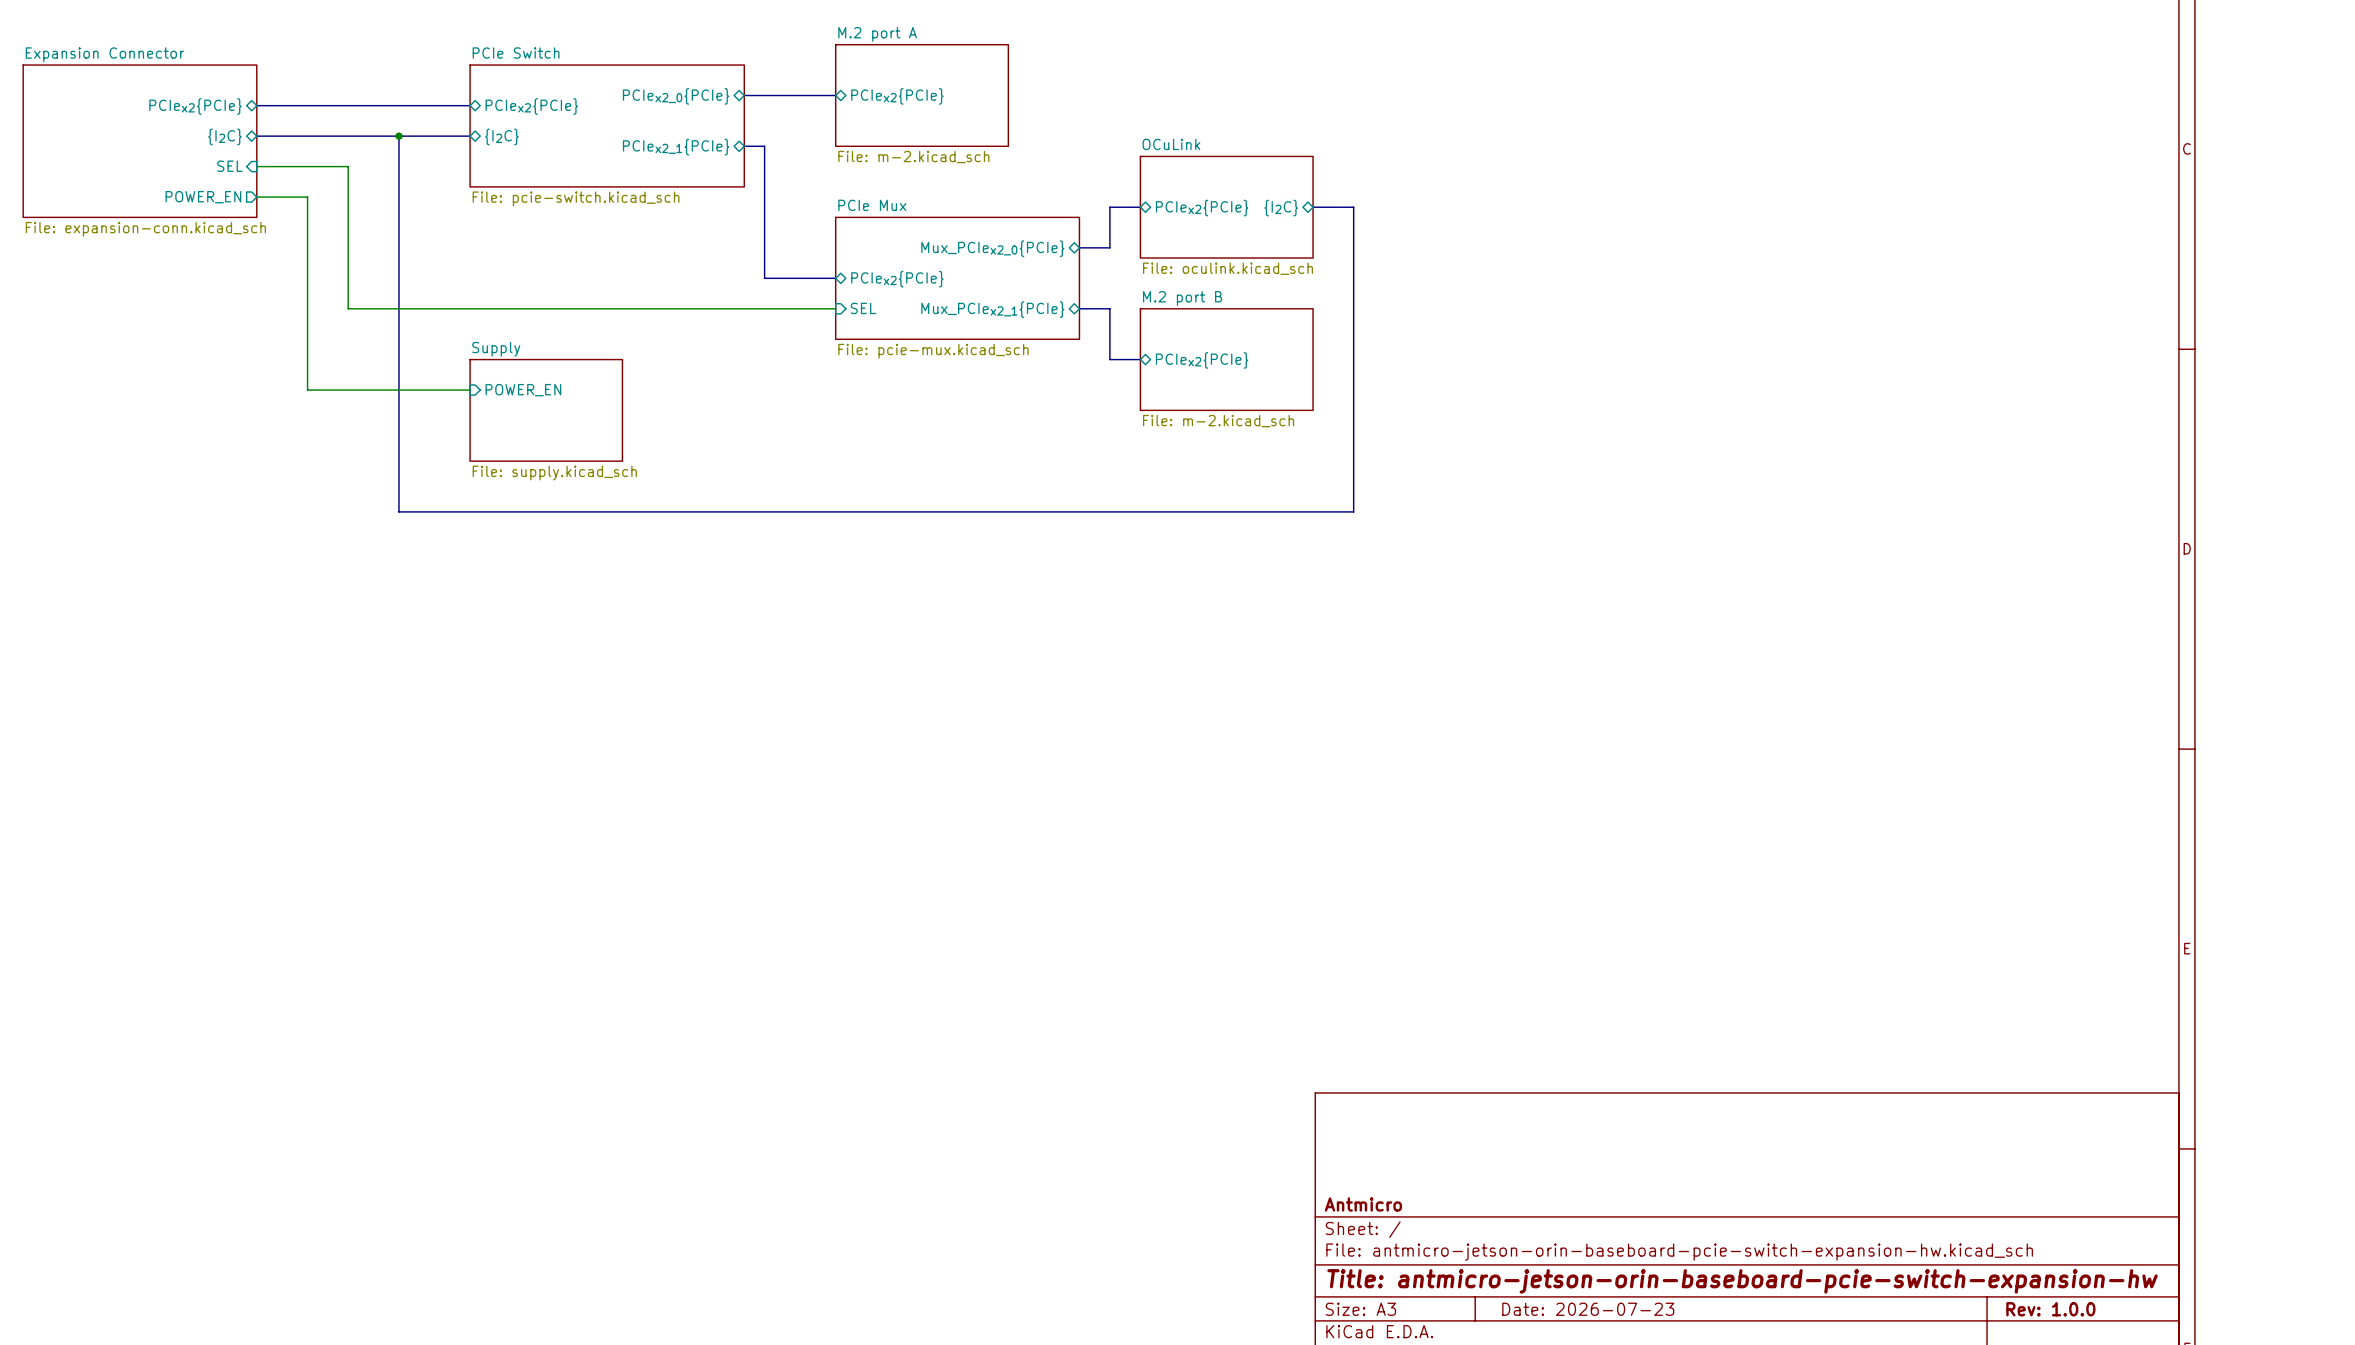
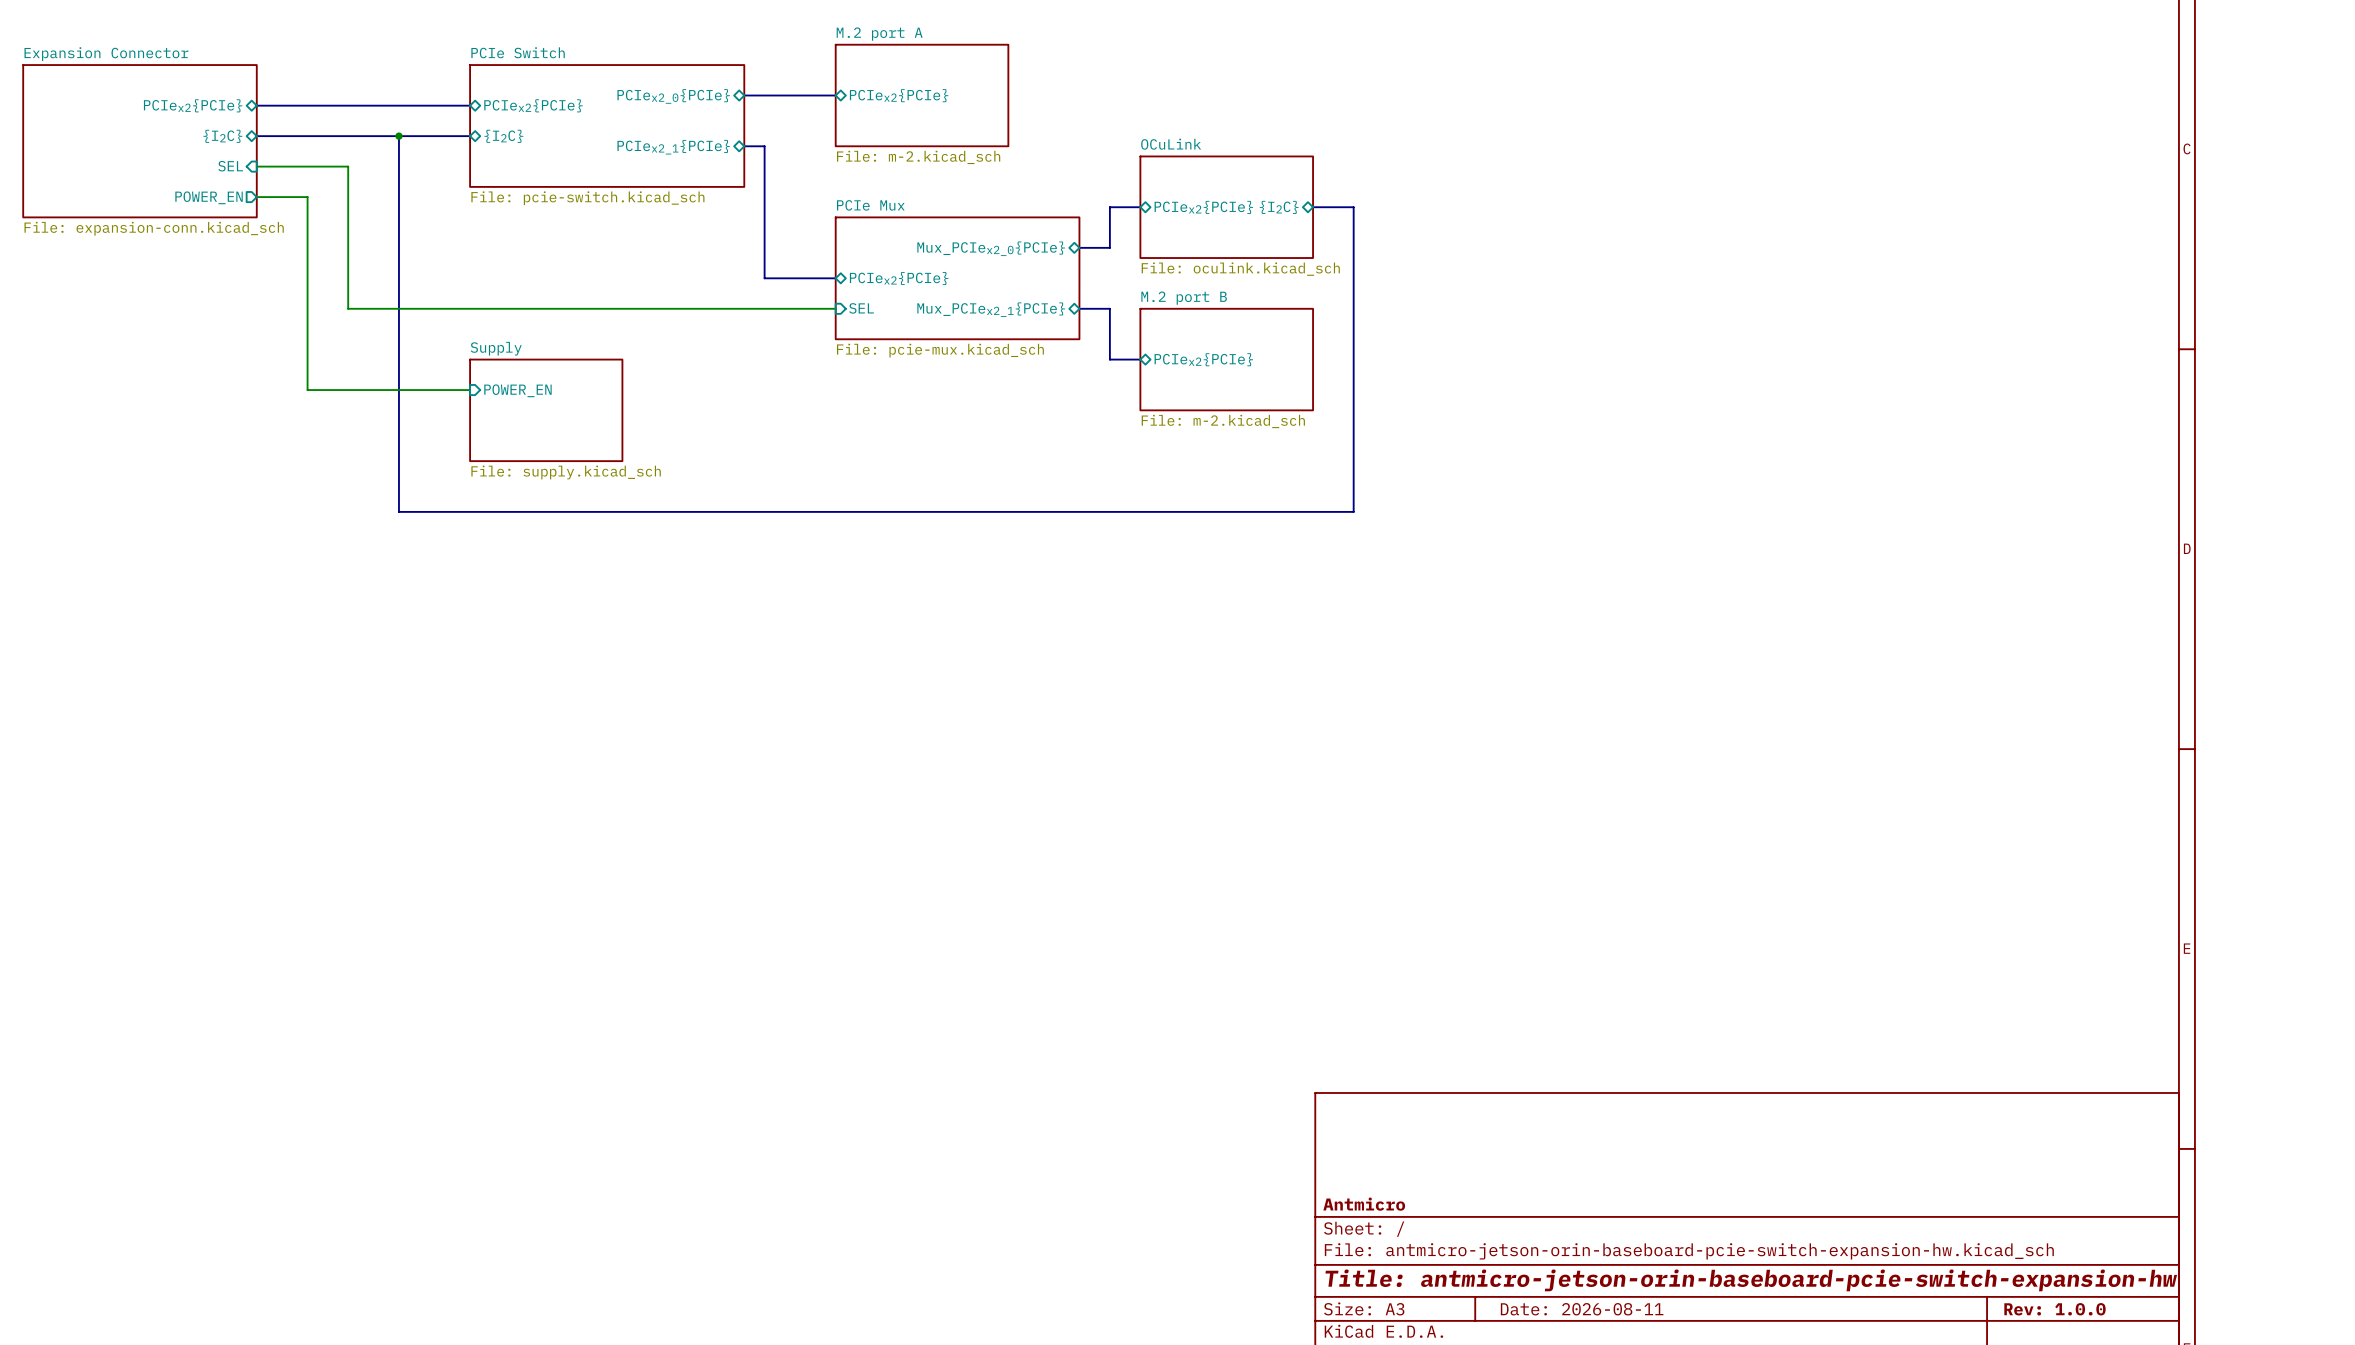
title block: Date: 2026-07-23 (1588, 1309) -> Date: 2026-08-11 (1582, 1309)

